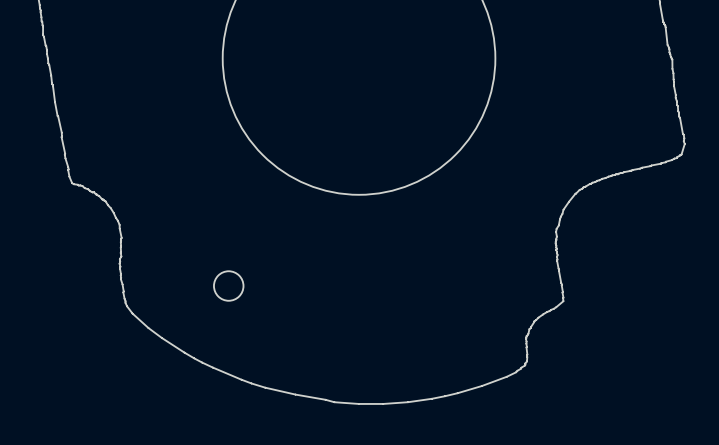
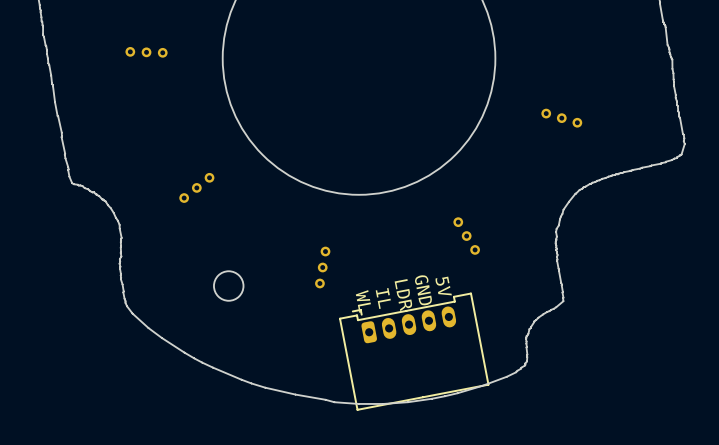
part: none -> (146, 52)
part: none -> (561, 118)
part: none -> (196, 187)
part: none -> (466, 236)
part: none -> (322, 267)
text: none -> 5V (443, 286)
text: none -> GND (423, 290)
text: none -> LDR (403, 295)
text: none -> IL (383, 298)
text: none -> WL (363, 301)
part: none -> (414, 351)

